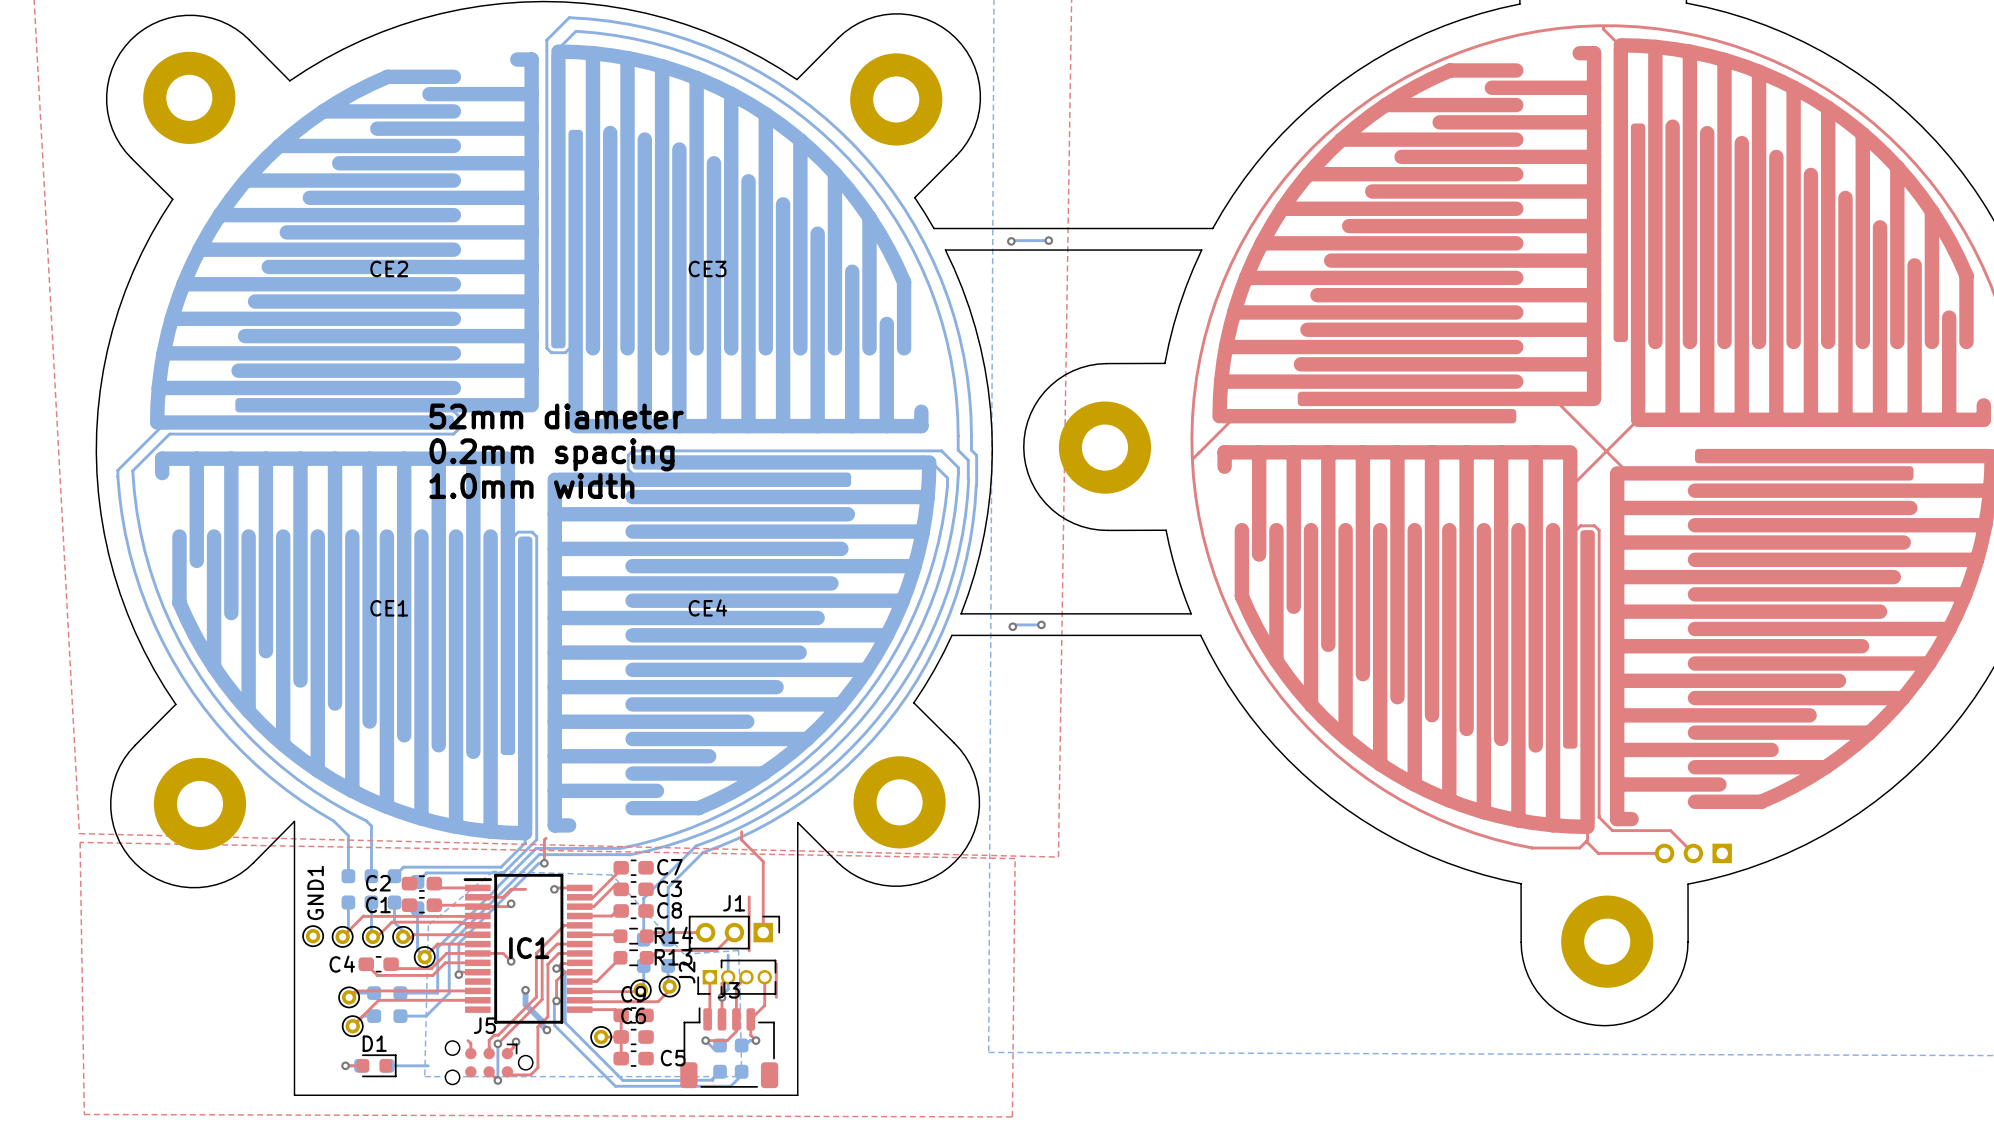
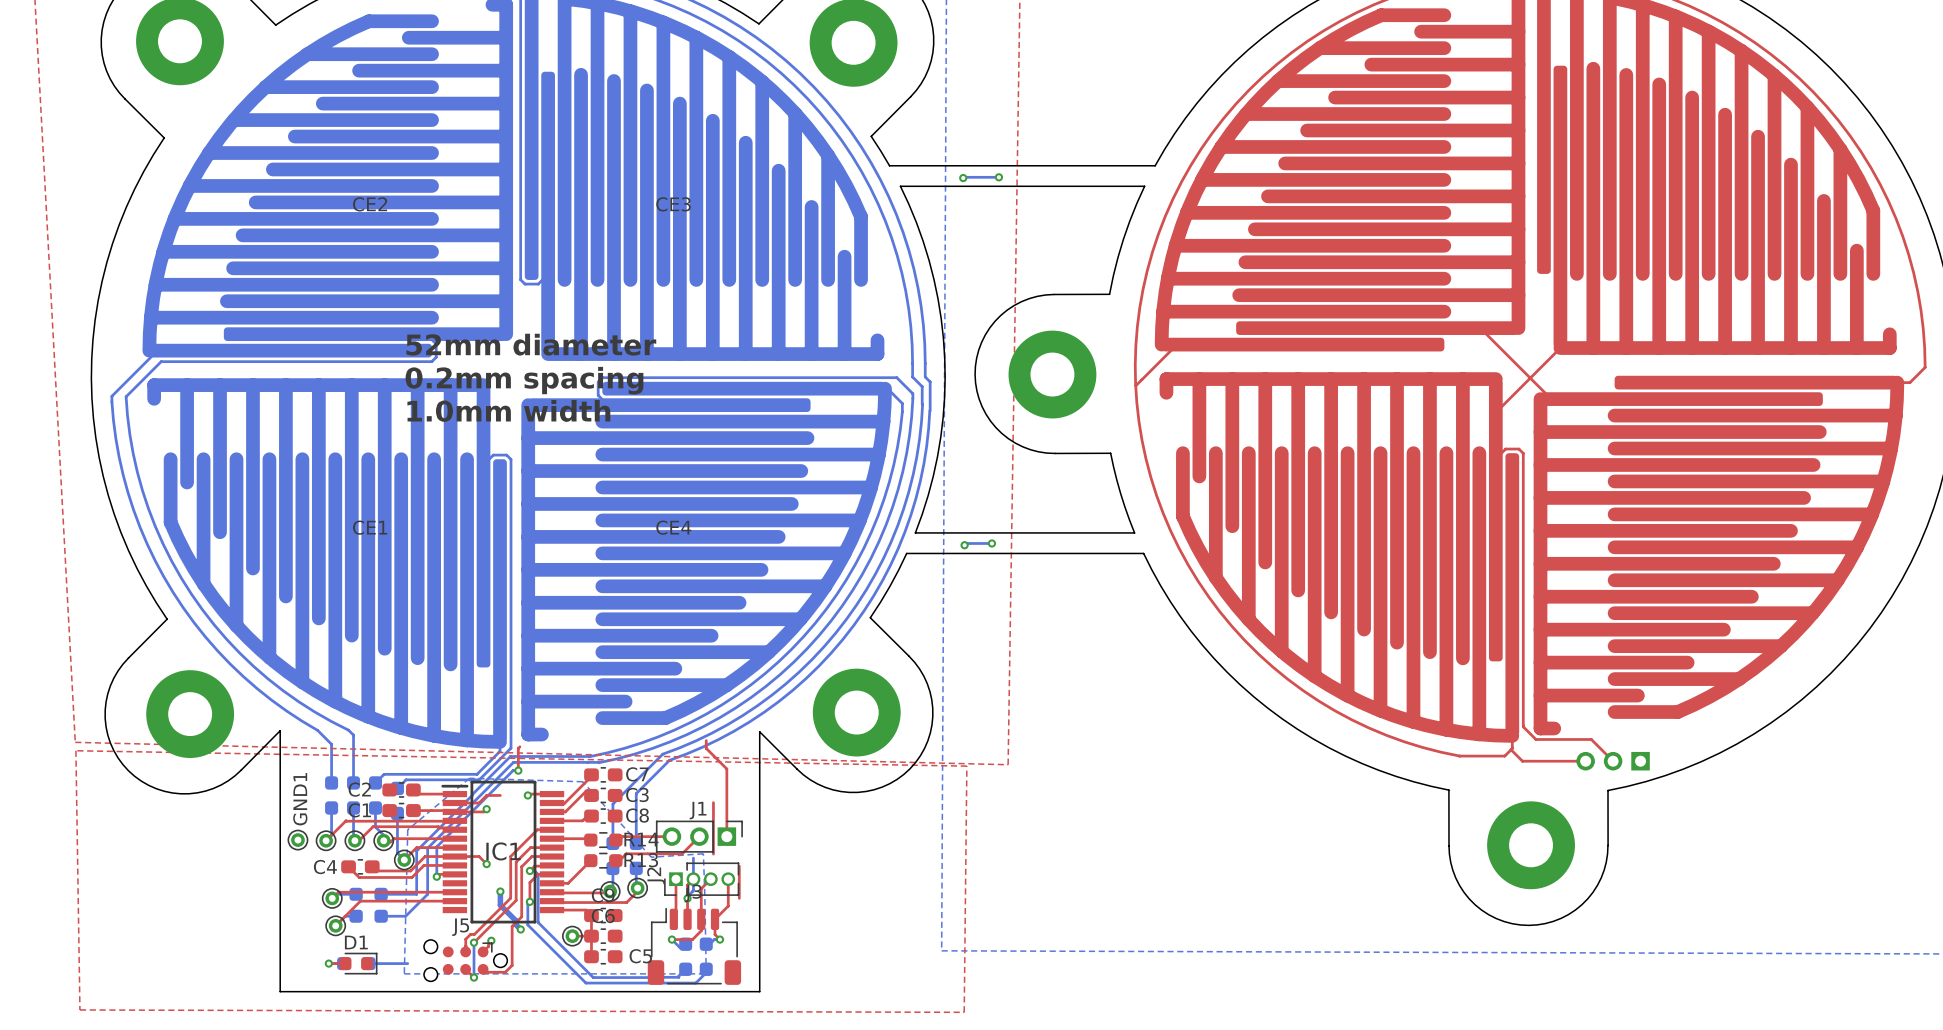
top track: (467, 1040) (470, 1043) (470, 1053) -> none

